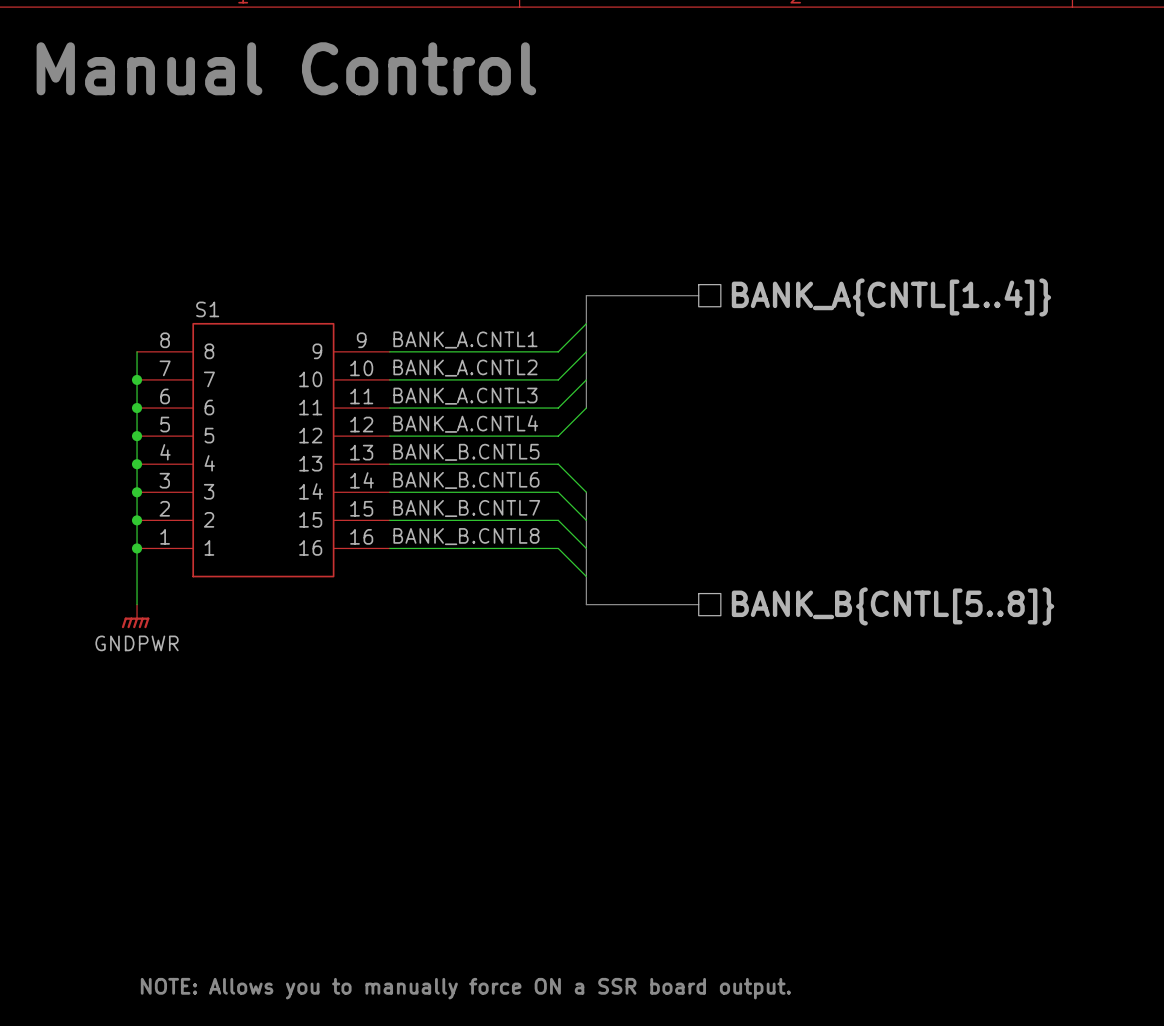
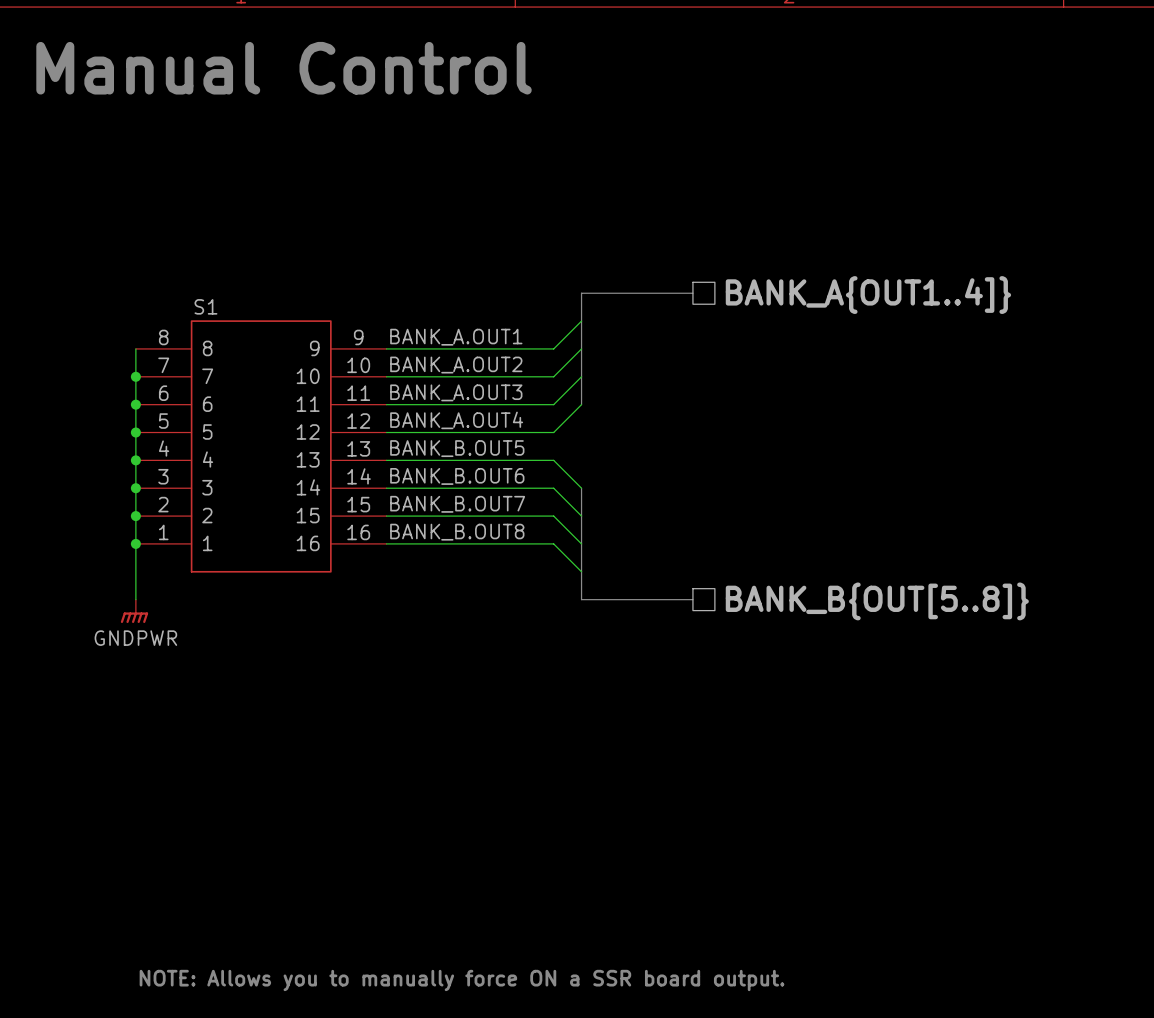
hierarchical label: BANK_A{CNTL[1..4]} (891, 297) -> BANK_A{OUT1..4]} (868, 295)
label: BANK_A.CNTL1 (465, 339) -> BANK_A.OUT1 (456, 337)
label: BANK_A.CNTL2 (465, 368) -> BANK_A.OUT2 (456, 365)
label: BANK_A.CNTL3 (465, 396) -> BANK_A.OUT3 (456, 392)
label: BANK_A.CNTL4 (465, 423) -> BANK_A.OUT4 (456, 420)
label: BANK_B.CNTL5 (466, 452) -> BANK_B.OUT5 (457, 448)
label: BANK_B.CNTL6 (466, 480) -> BANK_B.OUT6 (457, 476)
label: BANK_B.CNTL7 (466, 508) -> BANK_B.OUT7 (457, 504)
label: BANK_B.CNTL8 (466, 536) -> BANK_B.OUT8 (457, 532)
hierarchical label: BANK_B{CNTL[5..8]} (893, 606) -> BANK_B{OUT[5..8]} (877, 601)

